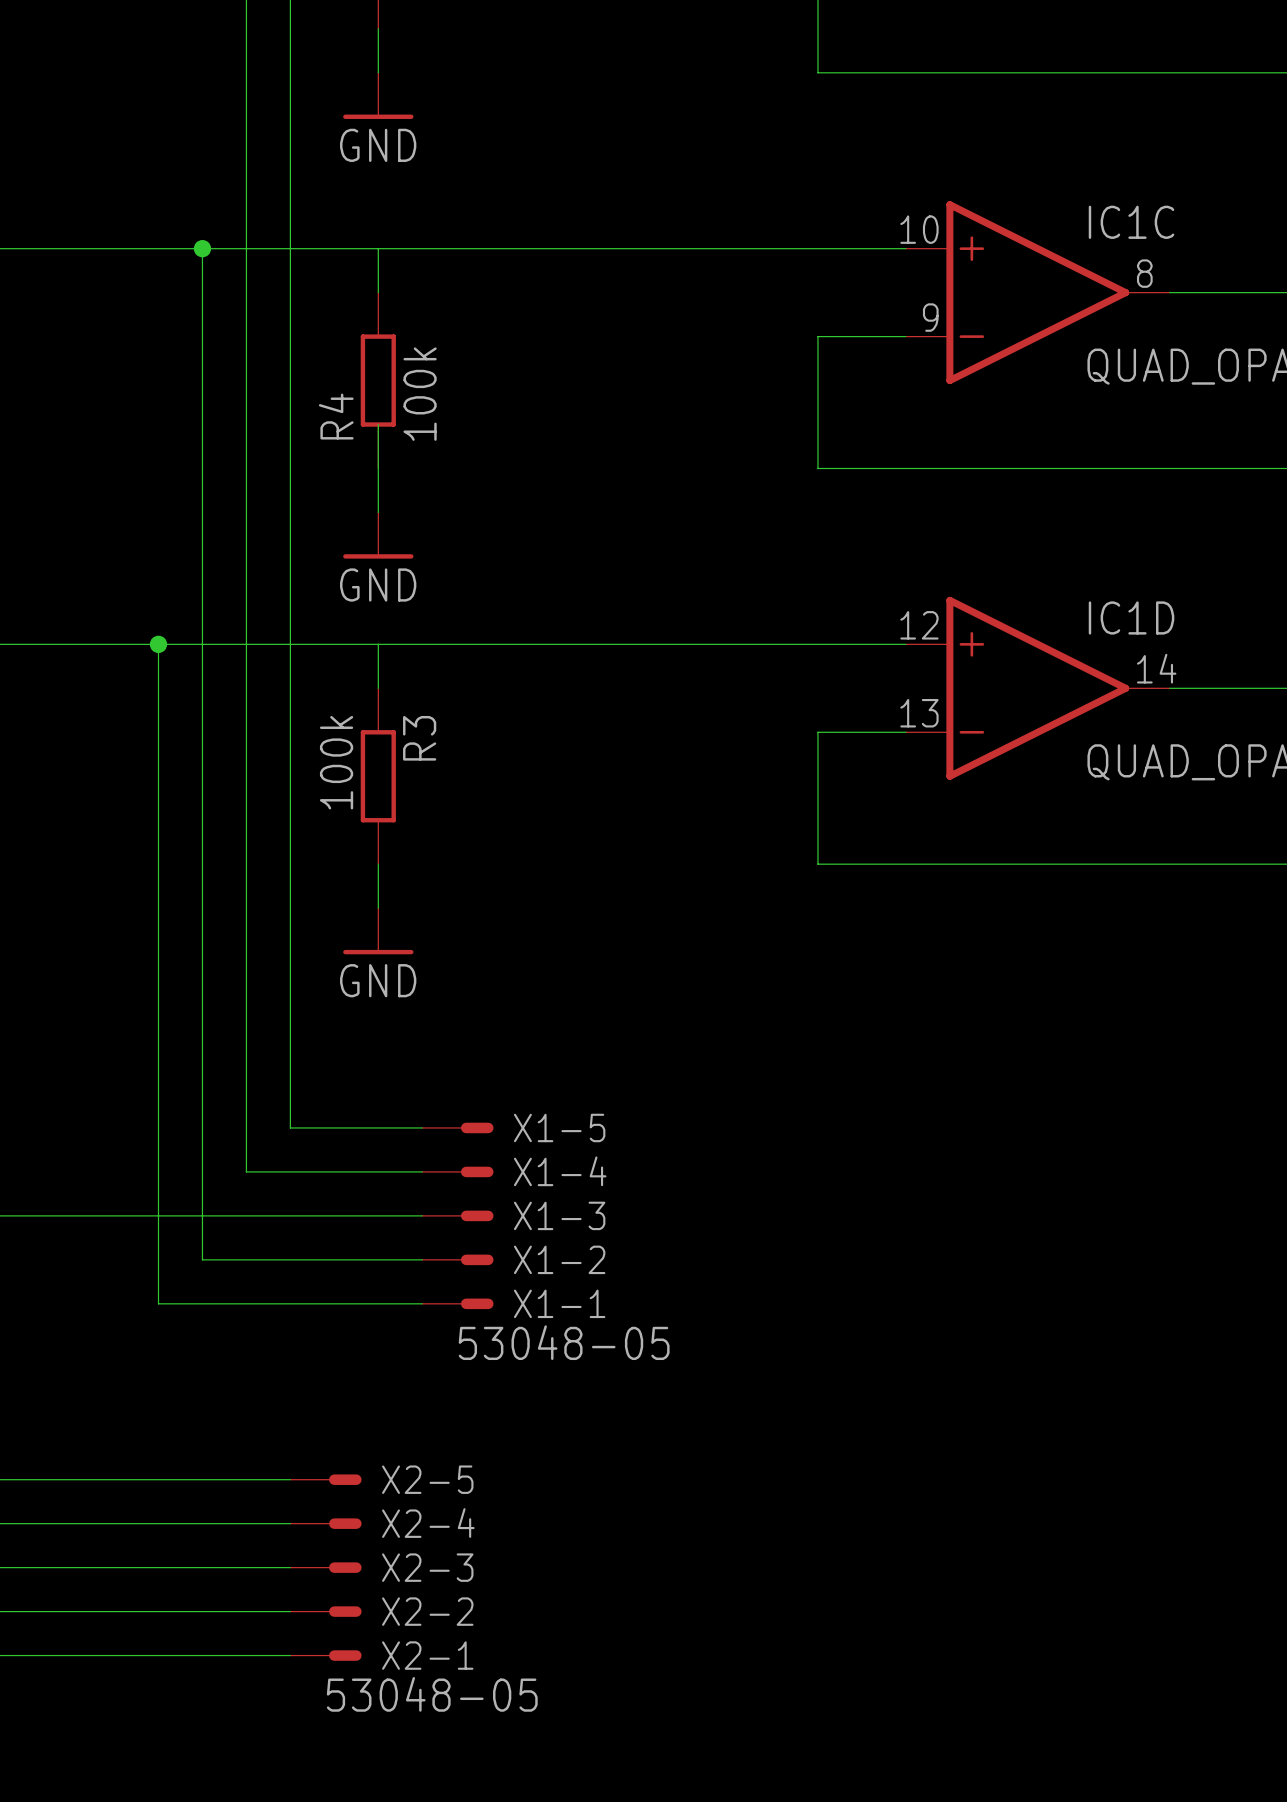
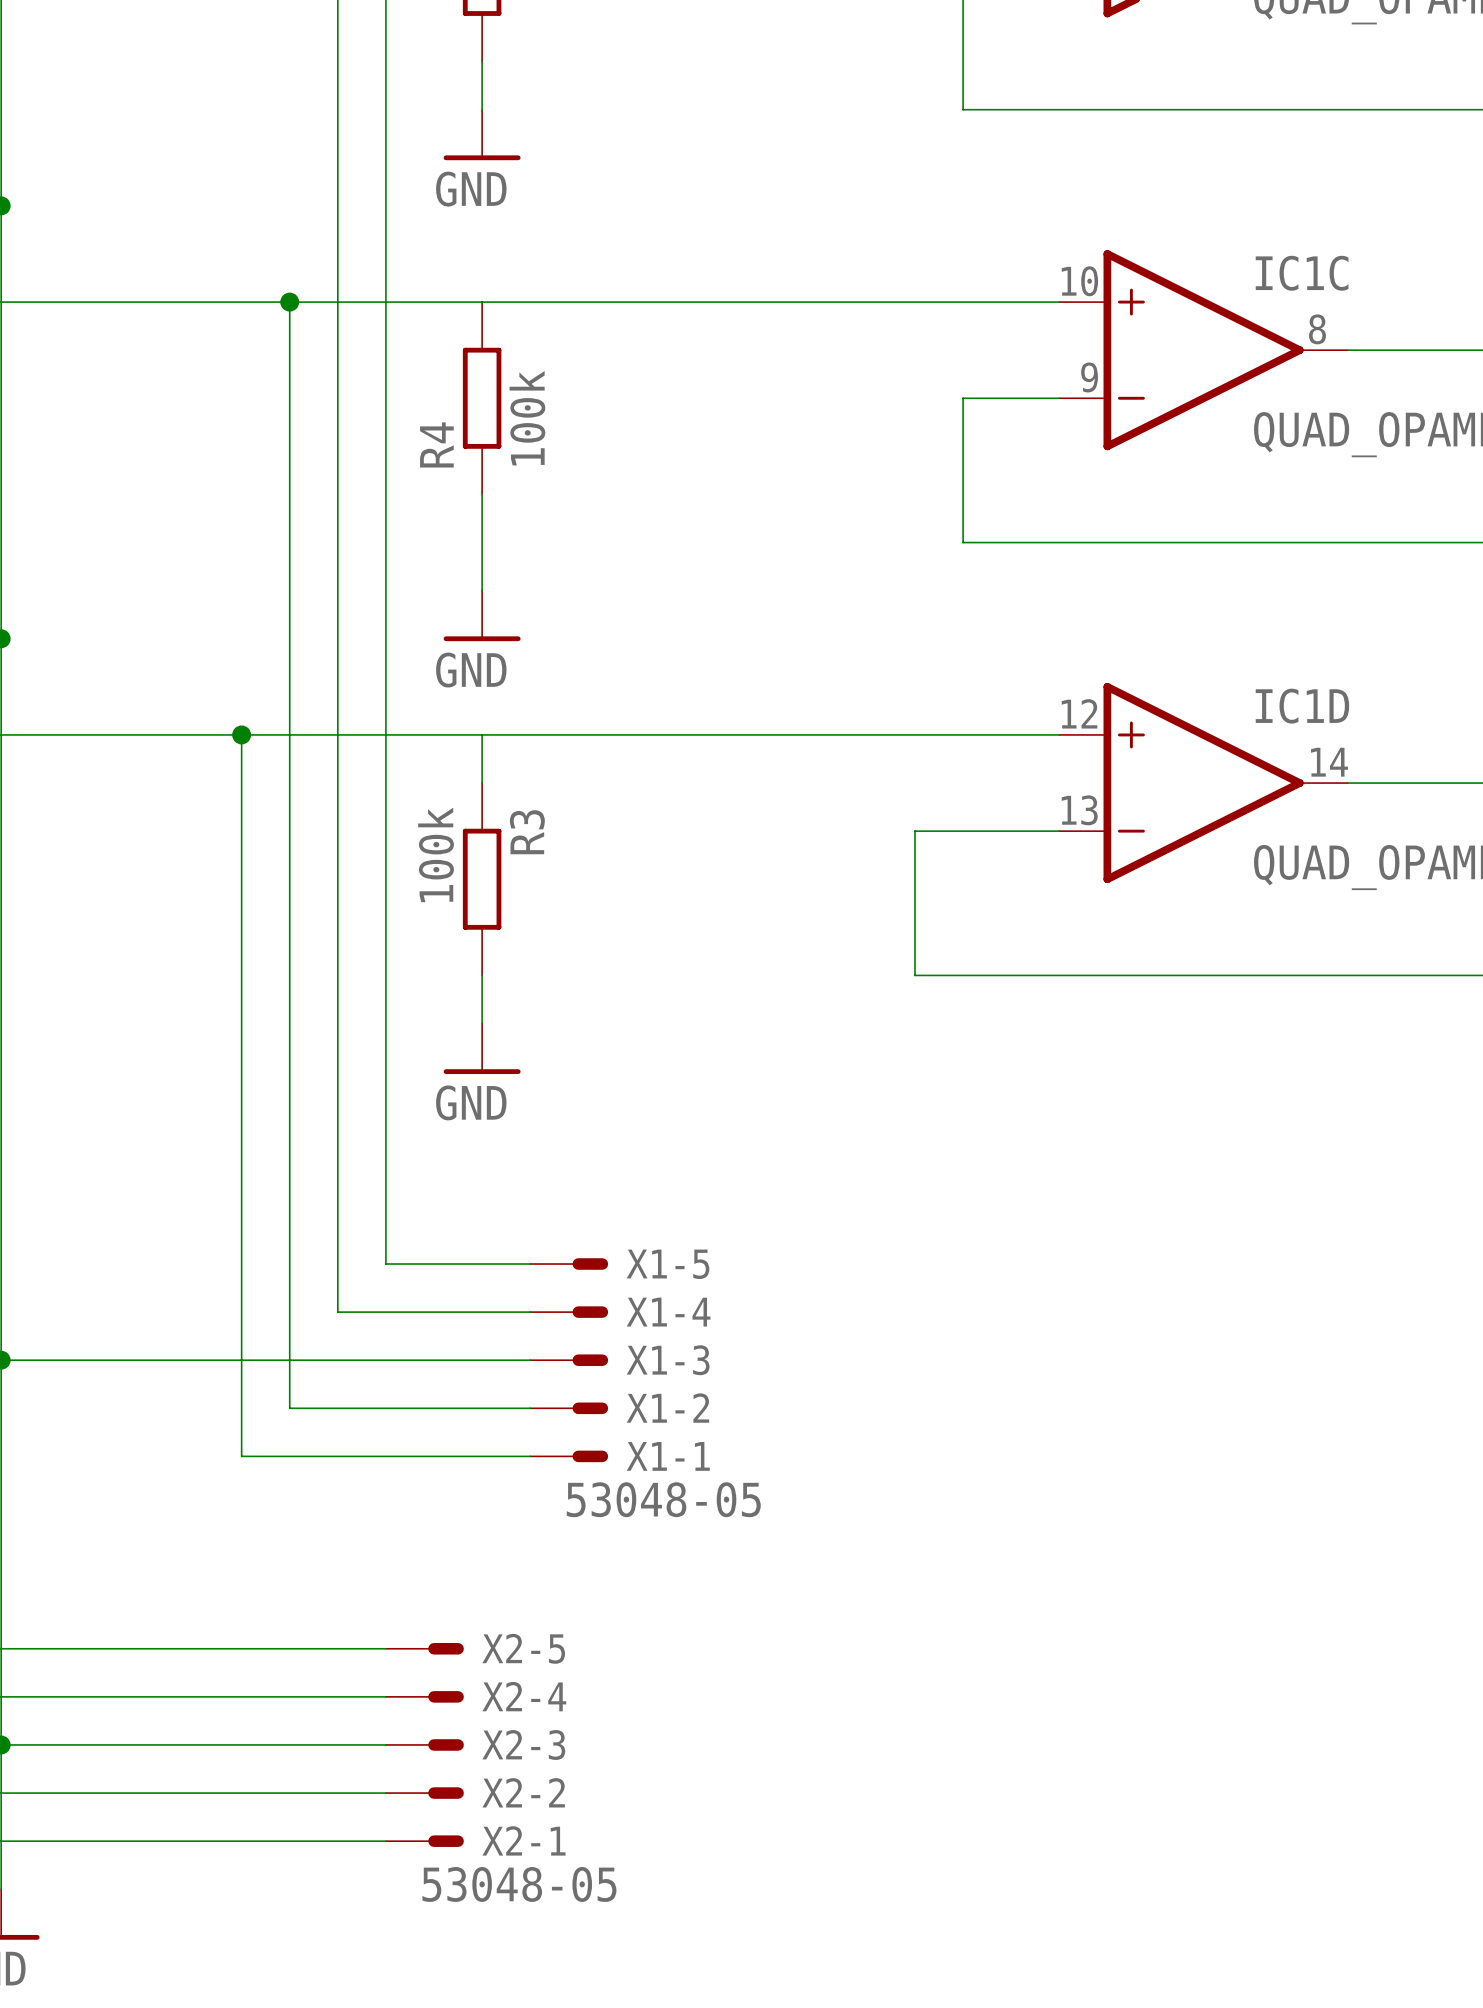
R4 position: (378, 380) -> (482, 398)
wire: (817, 732) (817, 864) -> (963, 831) (914, 831) (914, 975) (963, 975)

